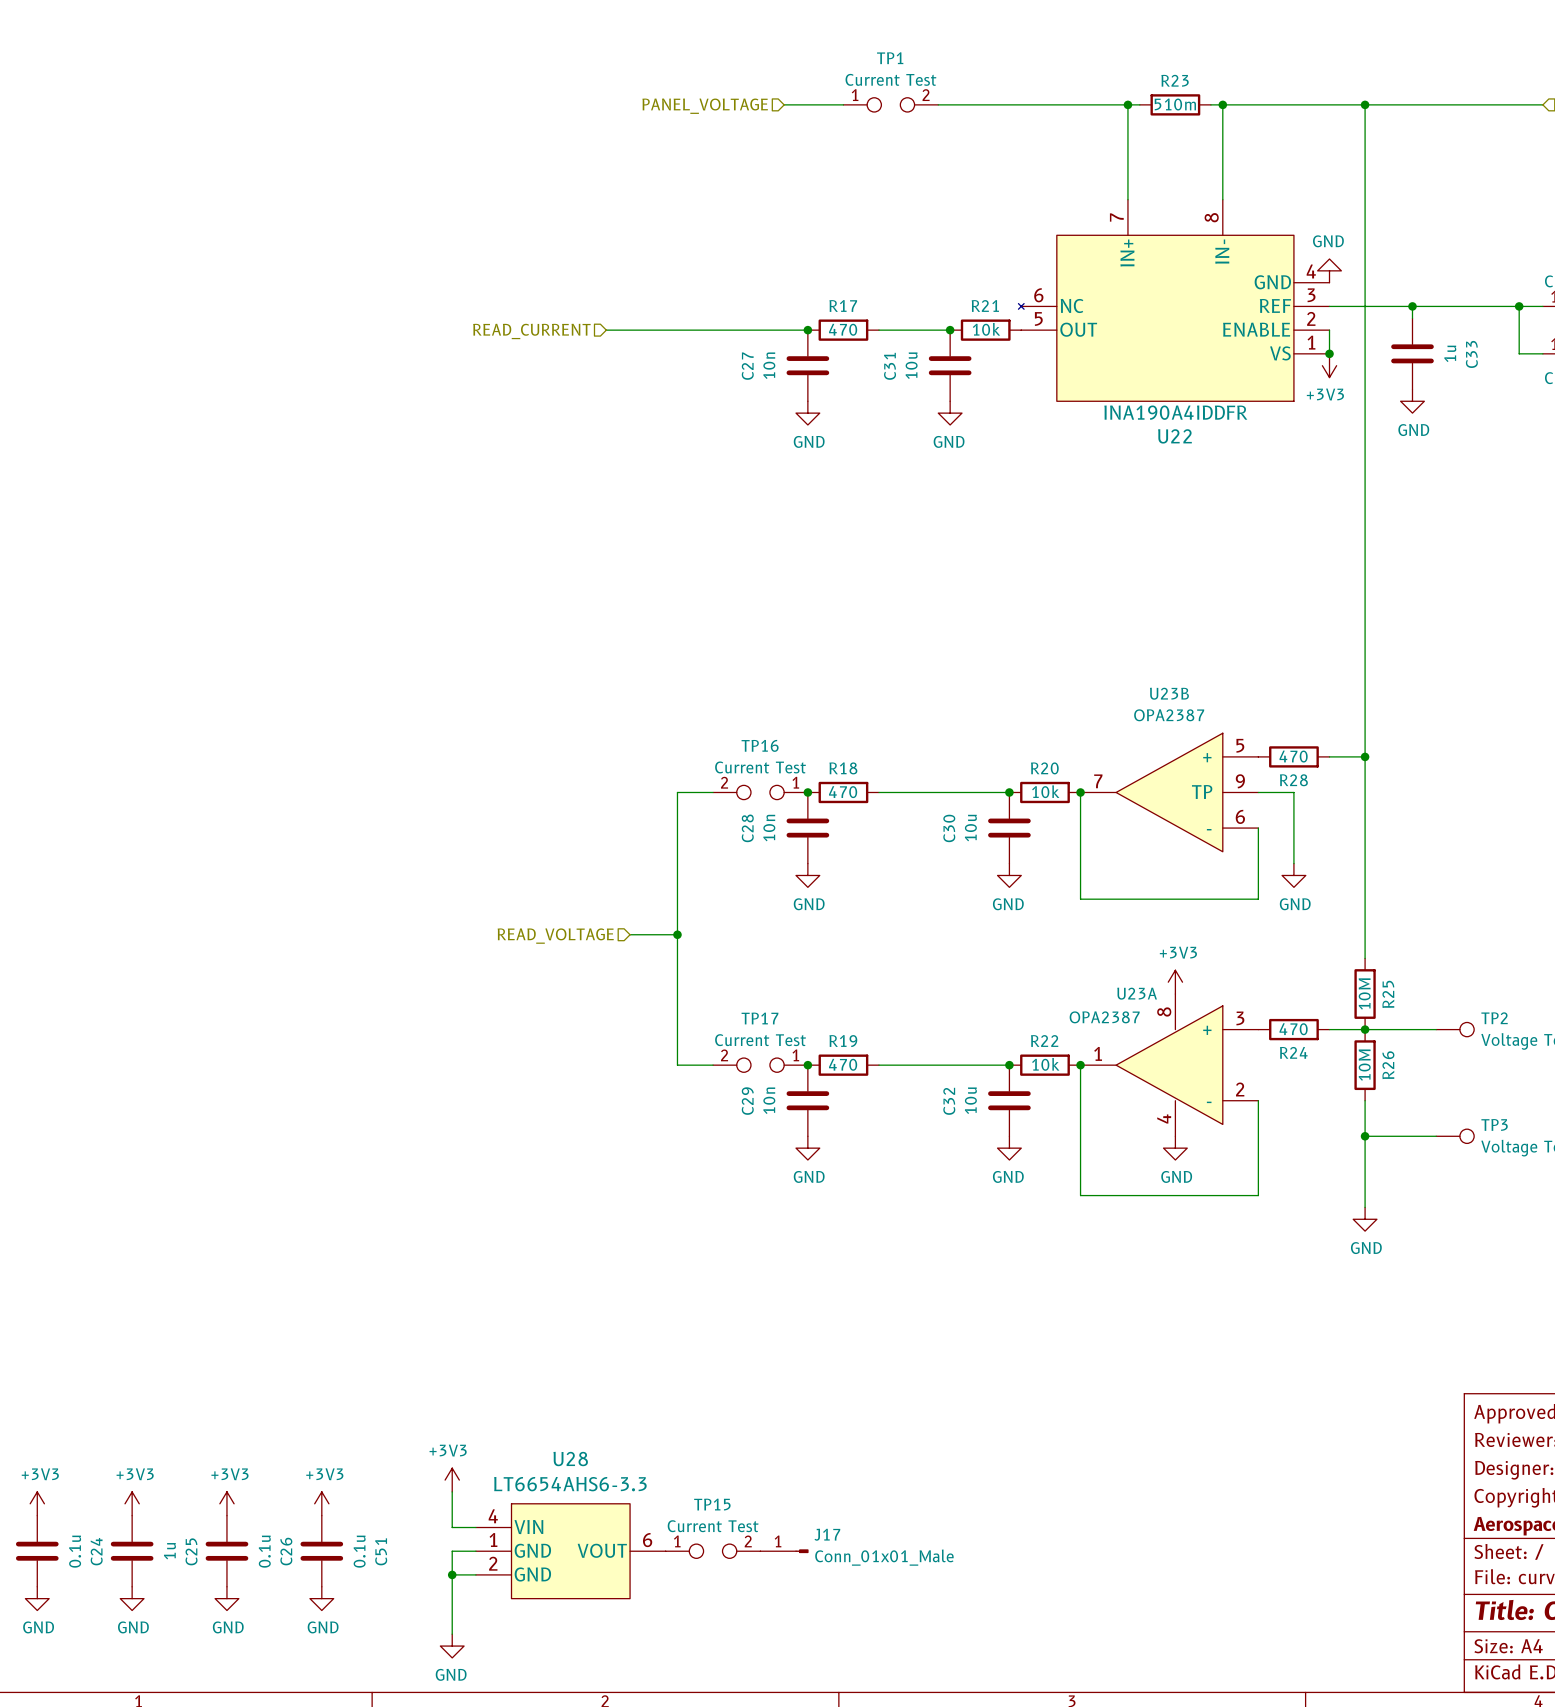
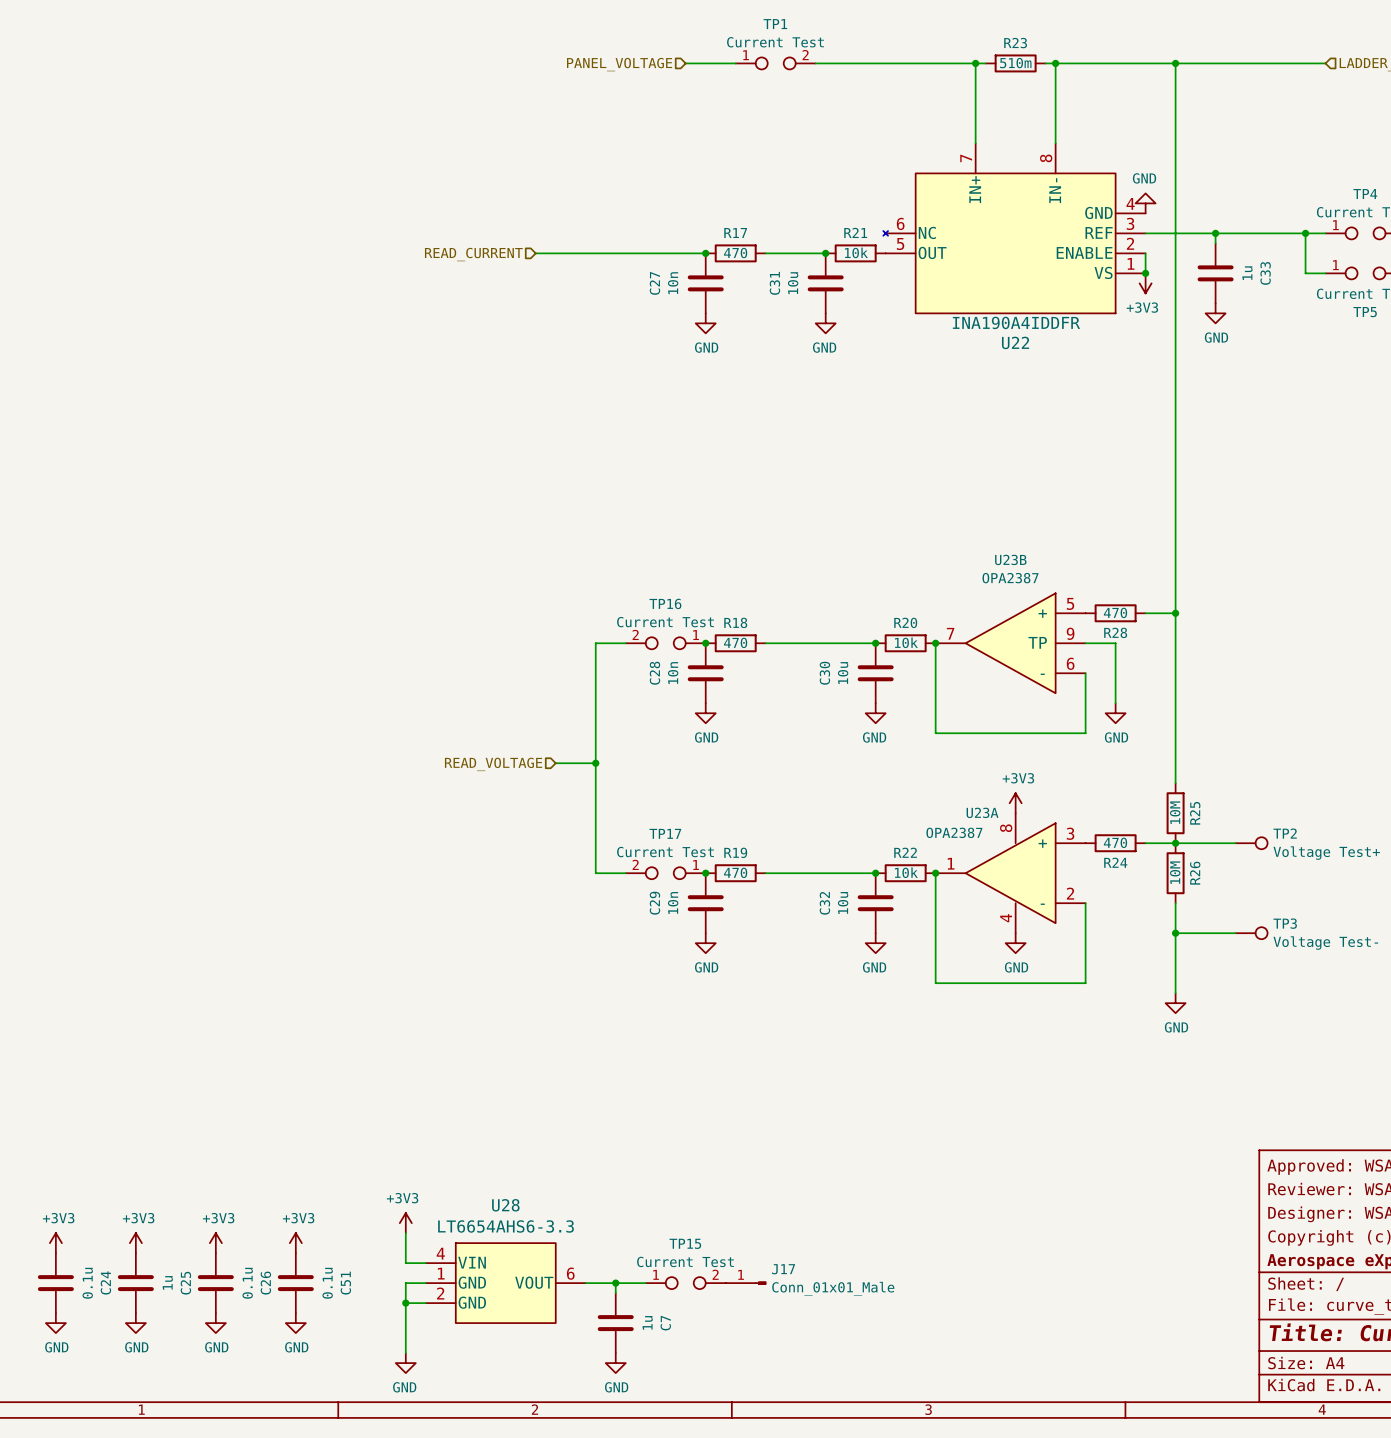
wire: none -> (585, 1283) (645, 1283)
wire: none -> (615, 1283) (615, 1293)
junction: none -> (615, 1283)
TP15 position: (713, 1551) -> (685, 1283)
J17 position: (784, 1551) -> (746, 1283)
C7: none -> 1u (615, 1323)
power symbol: none -> GND (615, 1363)

